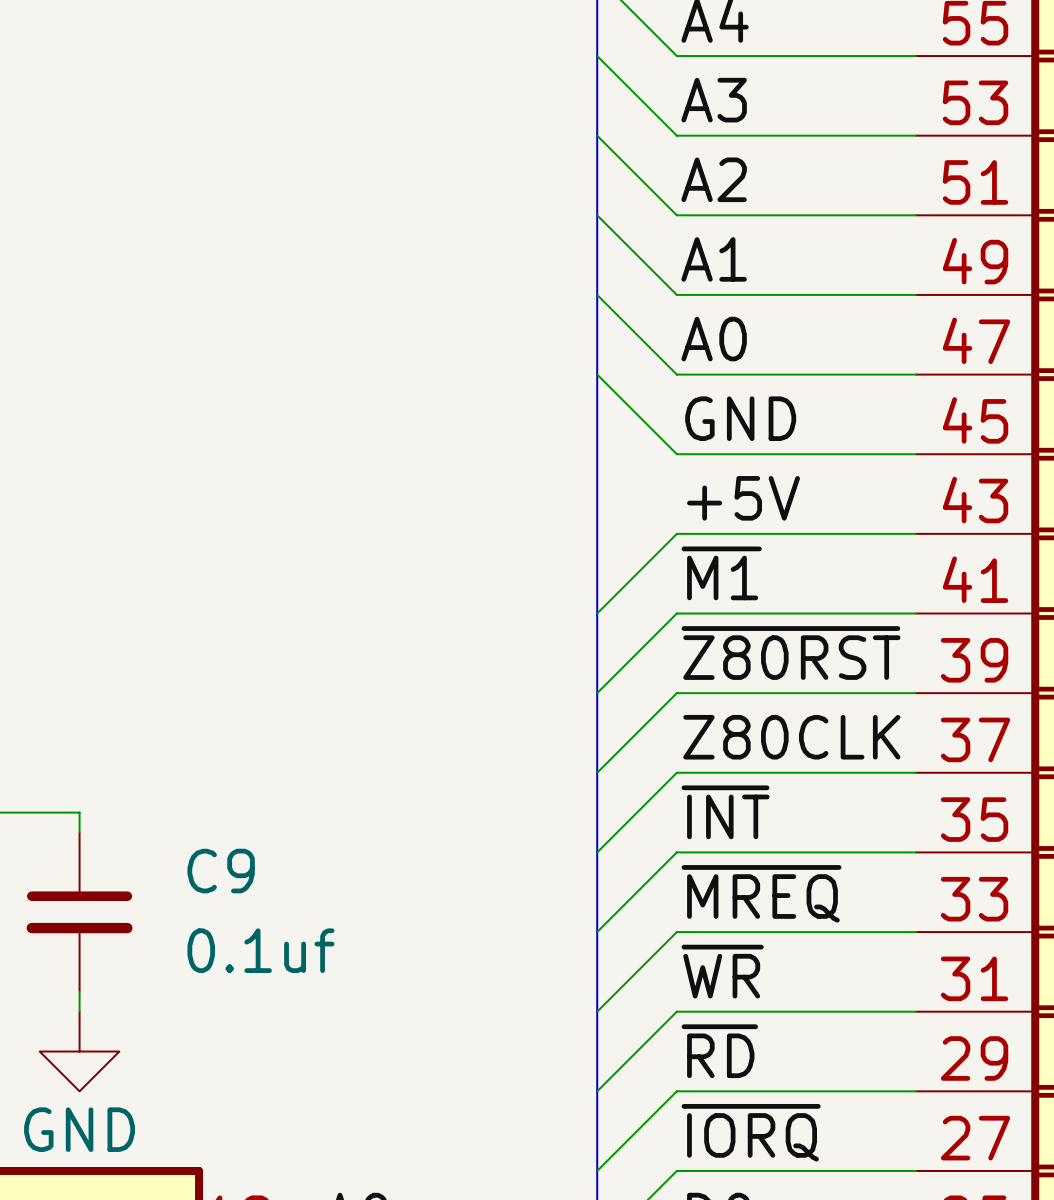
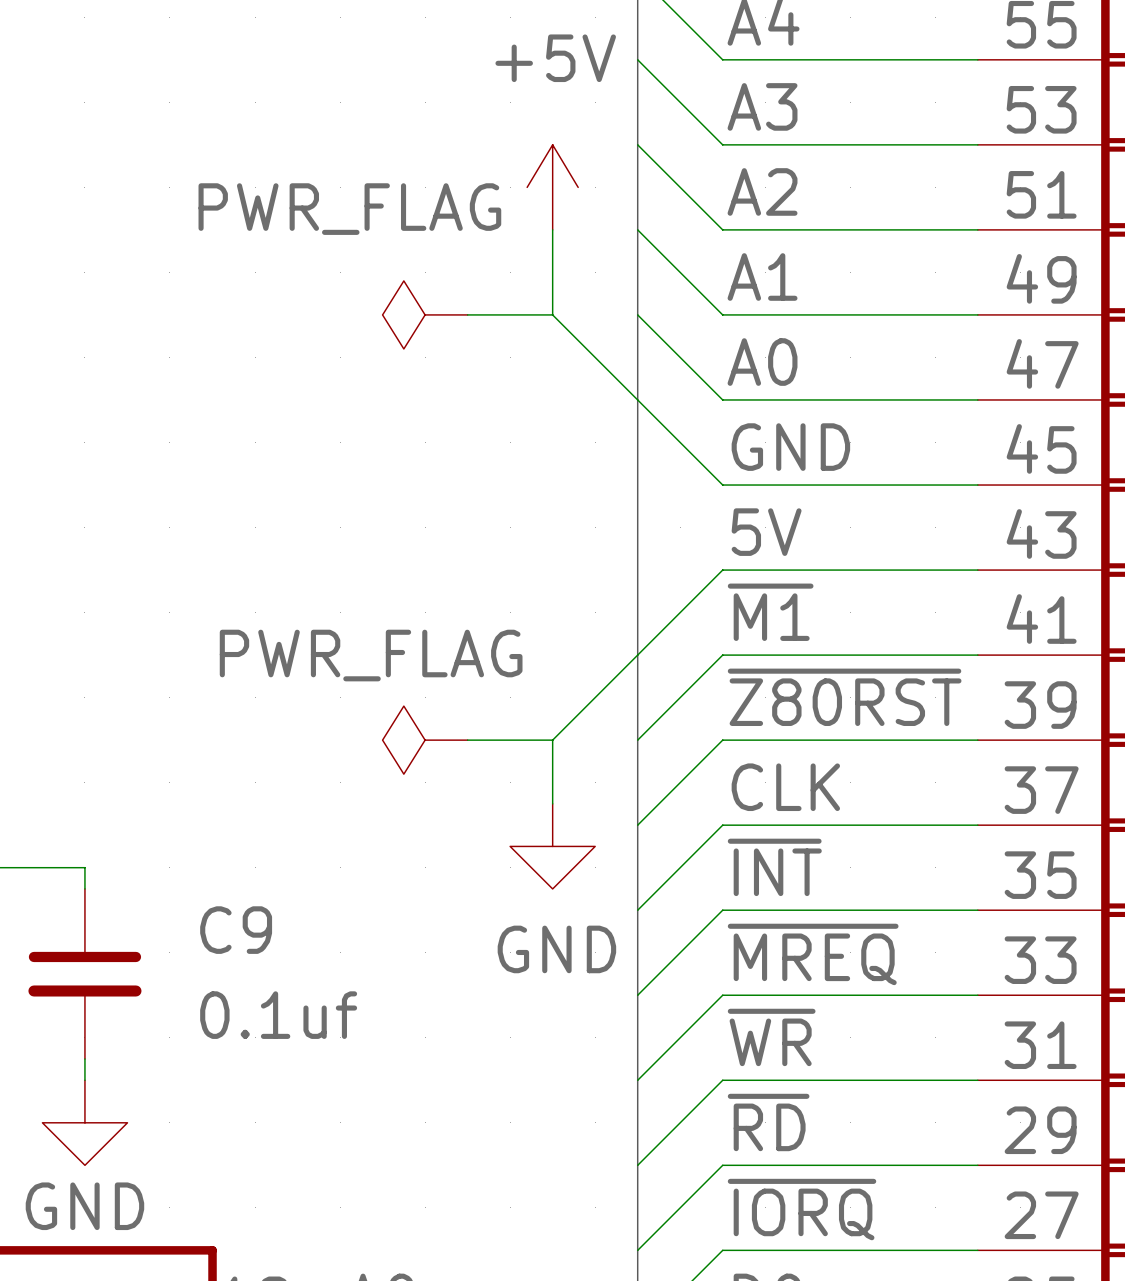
power symbol: none -> +5V (552, 187)
wire: none -> (552, 229) (552, 314)
power symbol: none -> PWR_FLAG (425, 314)
wire: none -> (467, 314) (552, 314)
wire: none -> (552, 314) (637, 399)
label: +5V (743, 498) -> 5V (766, 532)
wire: none -> (637, 655) (552, 740)
power symbol: none -> PWR_FLAG (425, 740)
wire: none -> (467, 740) (552, 740)
wire: none -> (552, 740) (552, 803)
label: Z80CLK (791, 737) -> CLK (785, 787)
power symbol: none -> GND (552, 846)

